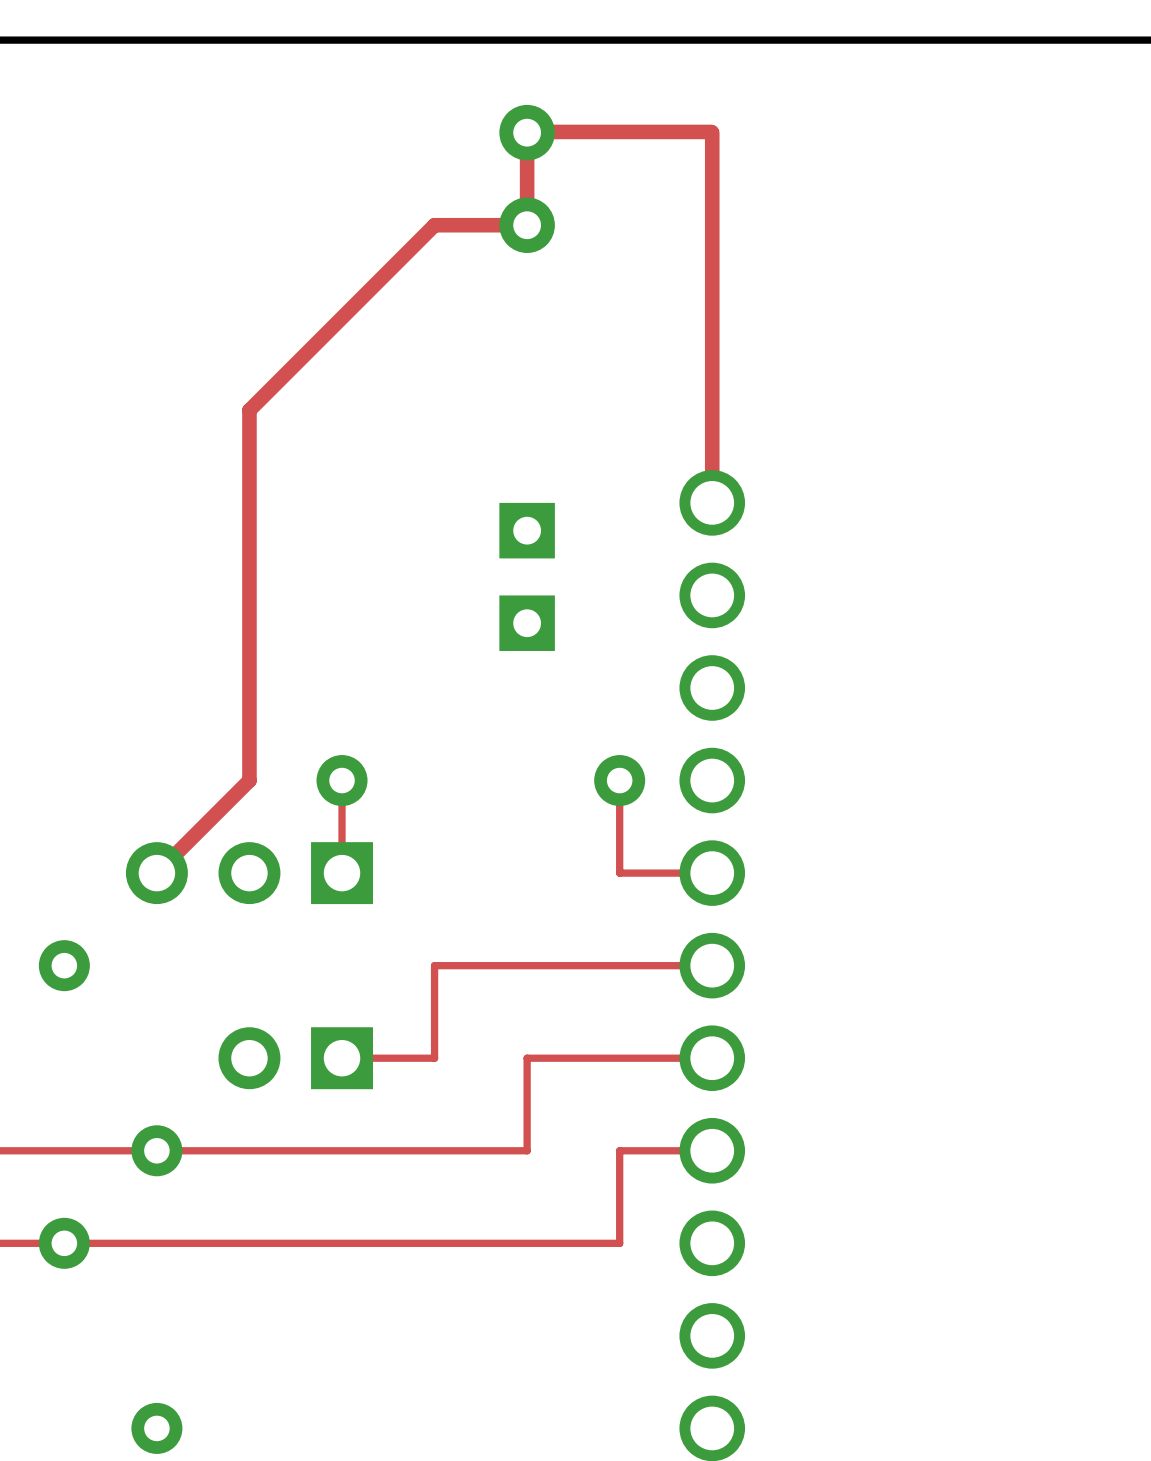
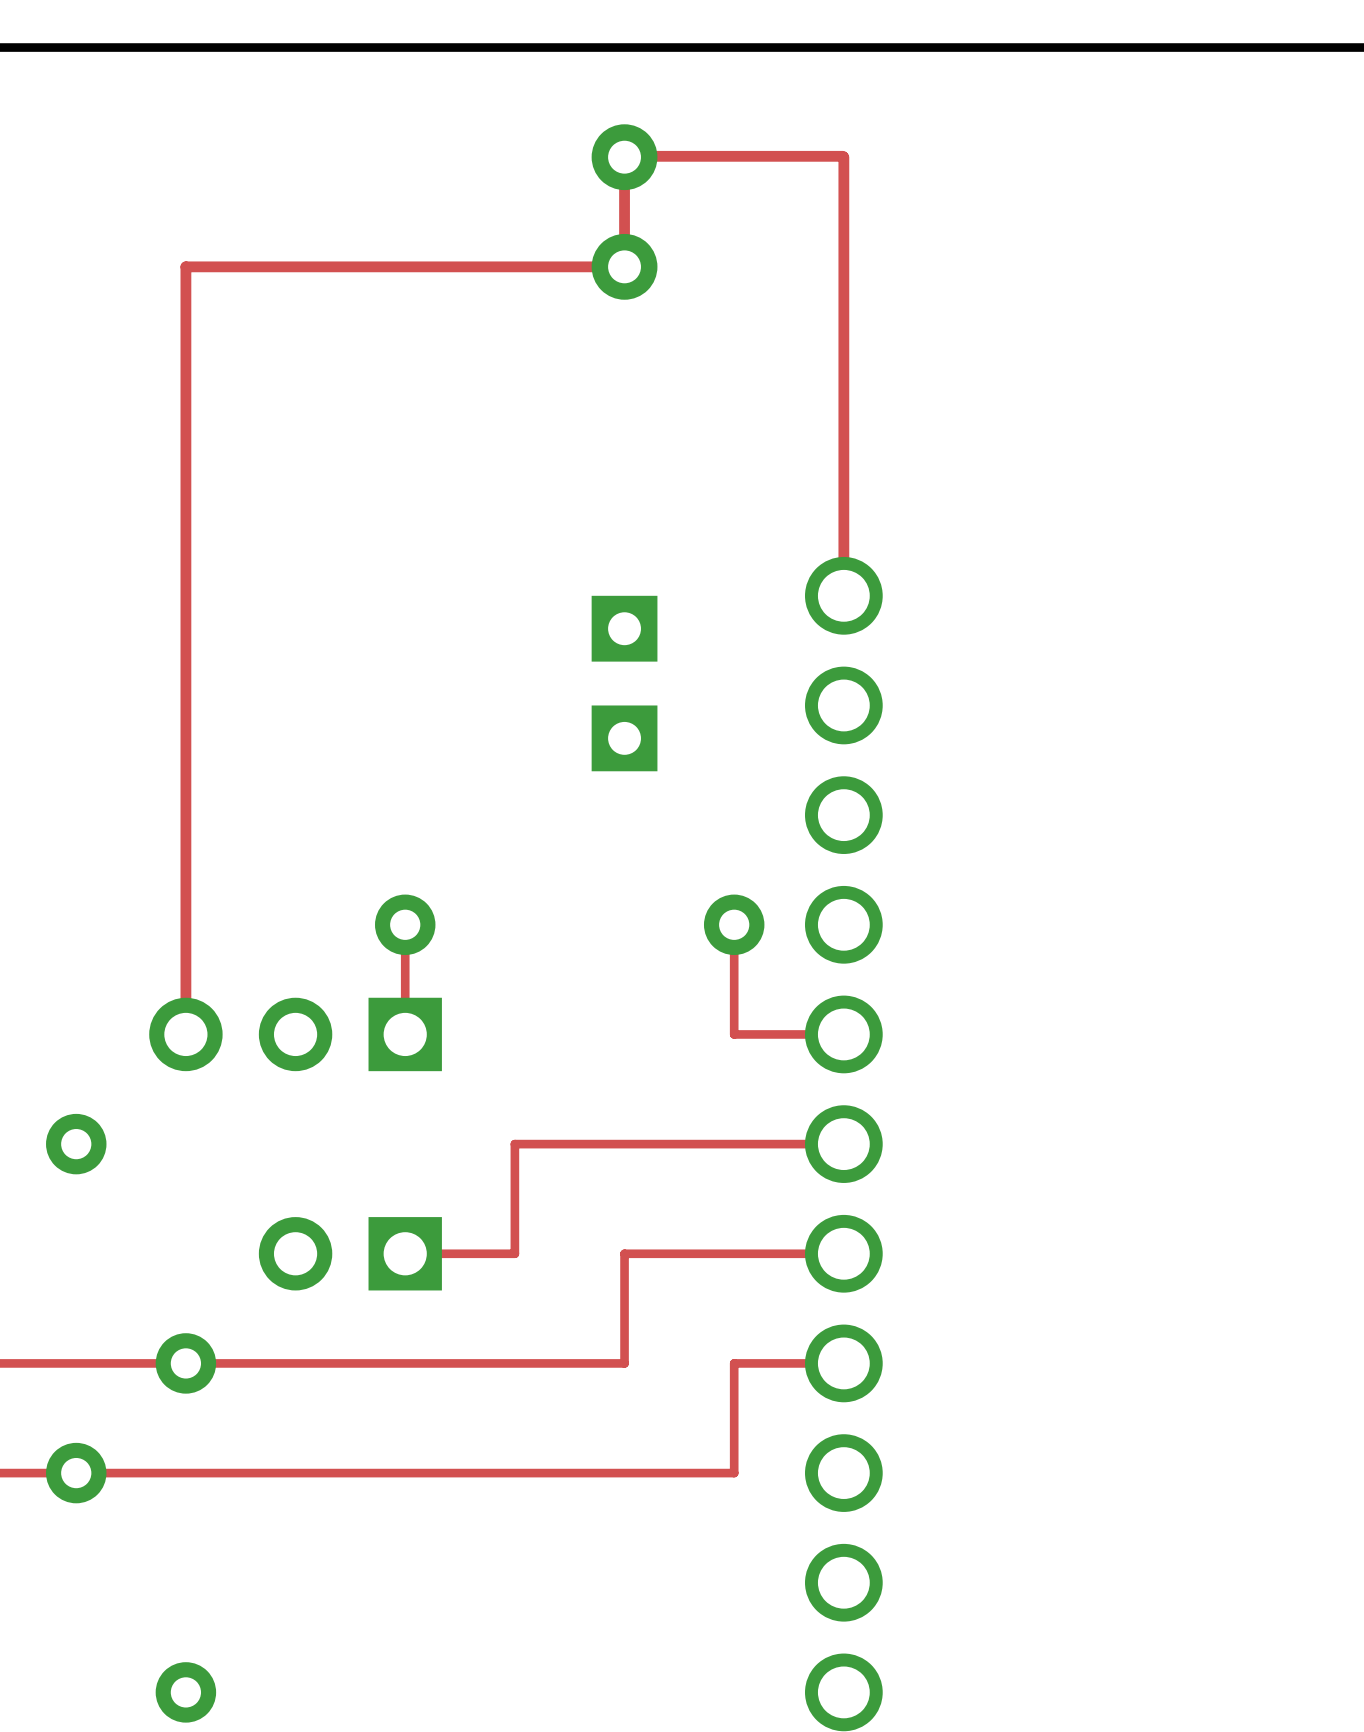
top track width: thick (711, 131) (527, 131) (527, 225) (434, 225) -> thin (842, 156) (625, 156) (624, 266) (514, 266)
top track width: thick (712, 132) (712, 502) -> thin (843, 157) (843, 595)
top track: (434, 225) (249, 410) (249, 780) (156, 873) -> (514, 266) (185, 266) (185, 1034)

